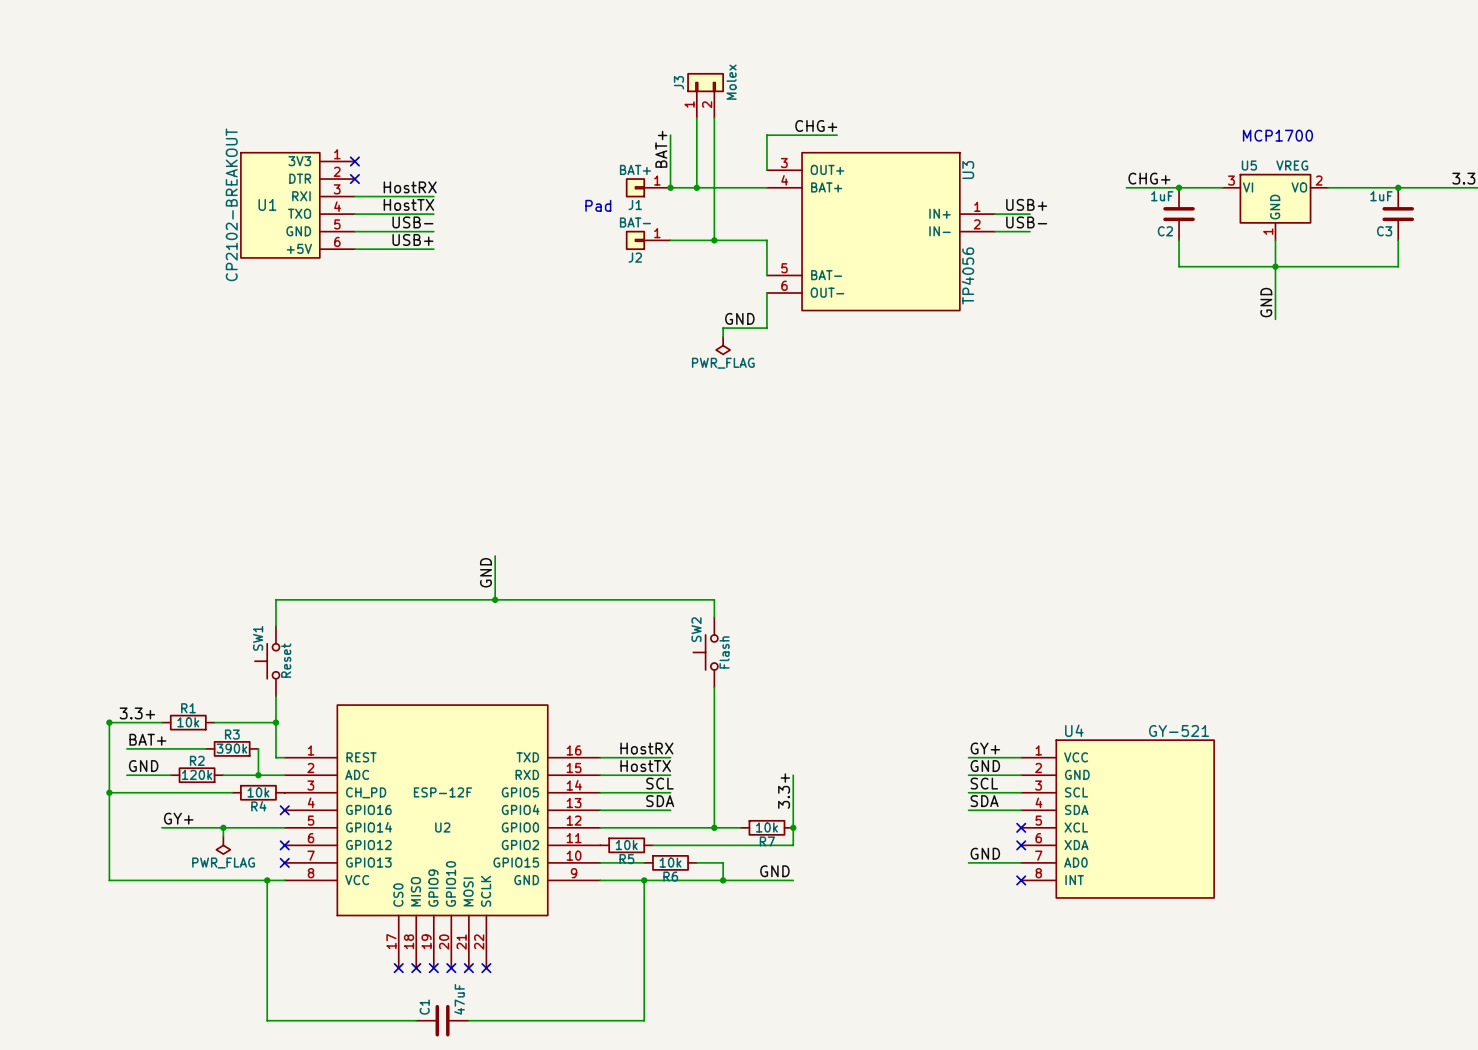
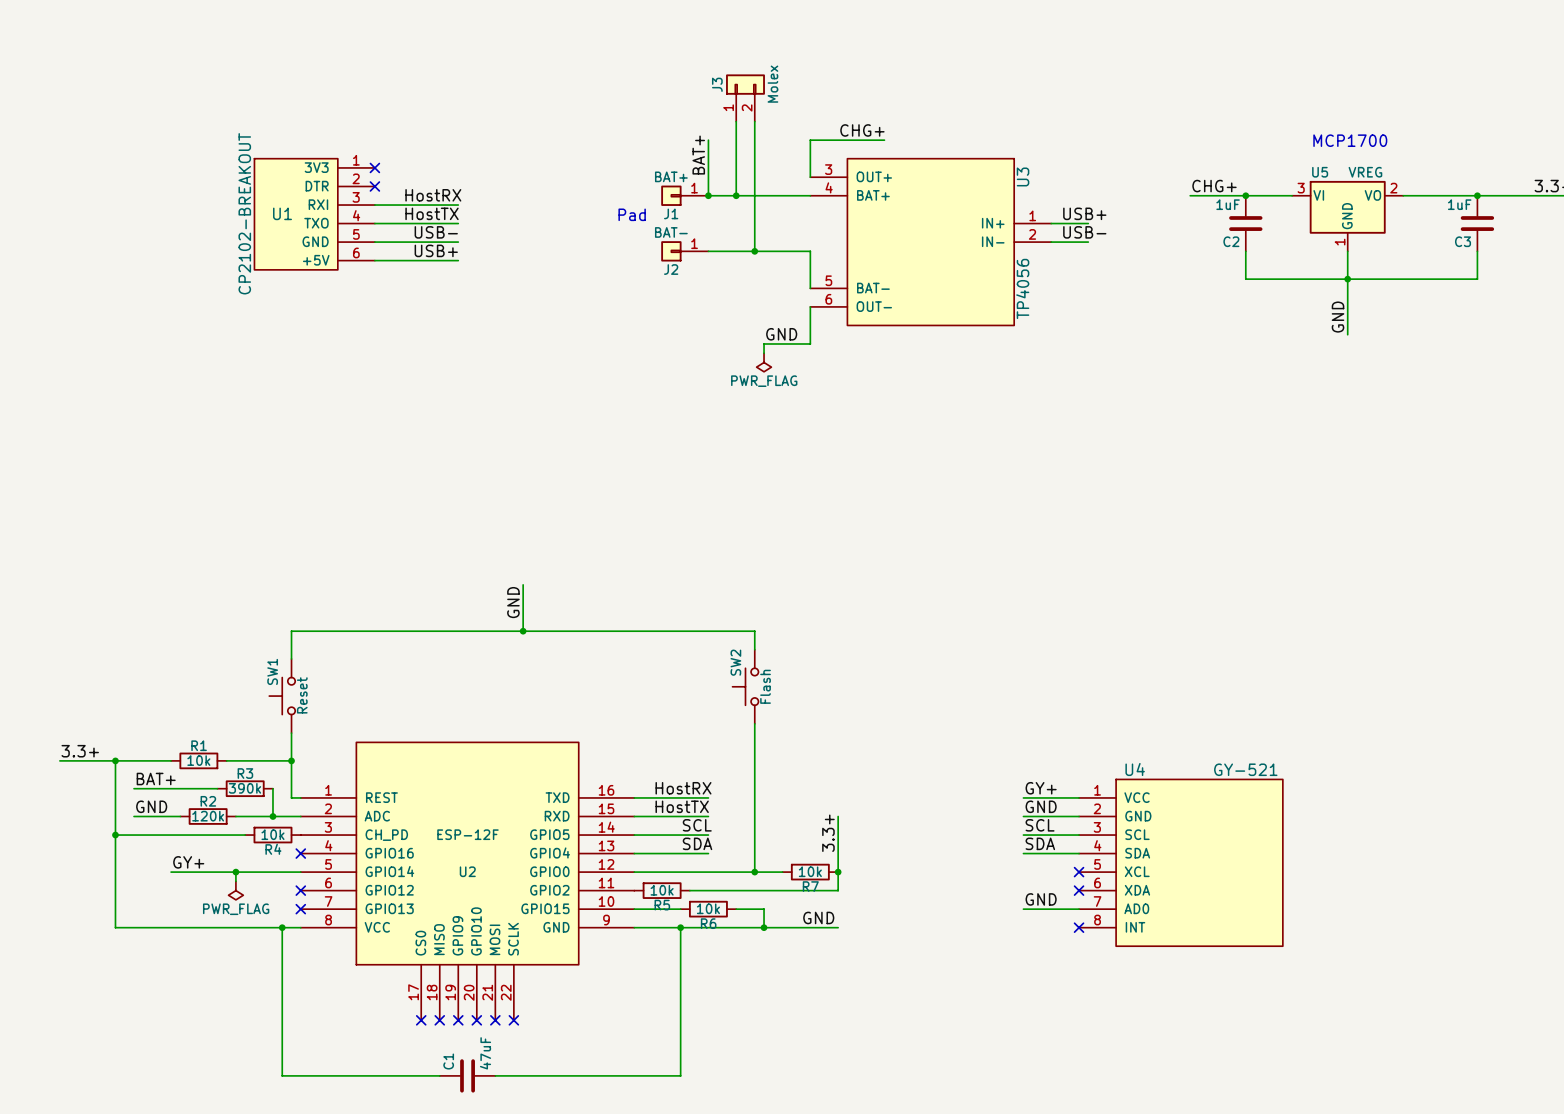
label position: 3.3+ (137, 713) -> 3.3+ (80, 751)
wire: none -> (59, 760) (115, 760)

